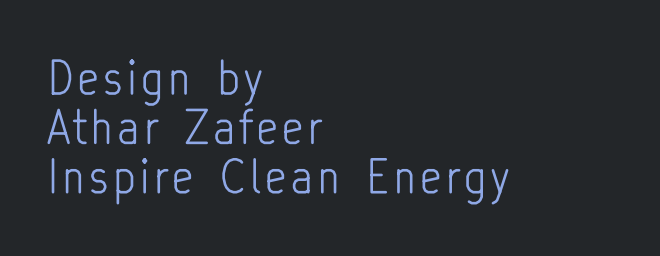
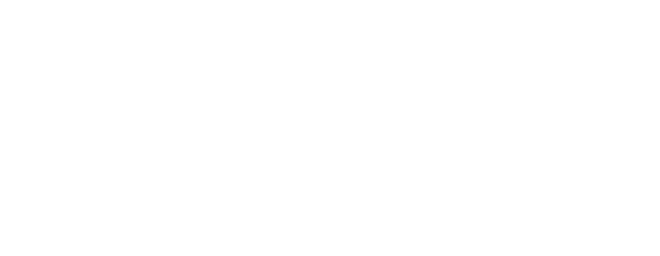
text: Design by (156, 82) -> none
text: Athar Zafeer (184, 126) -> none
text: Inspire Clean Energy (280, 181) -> none

